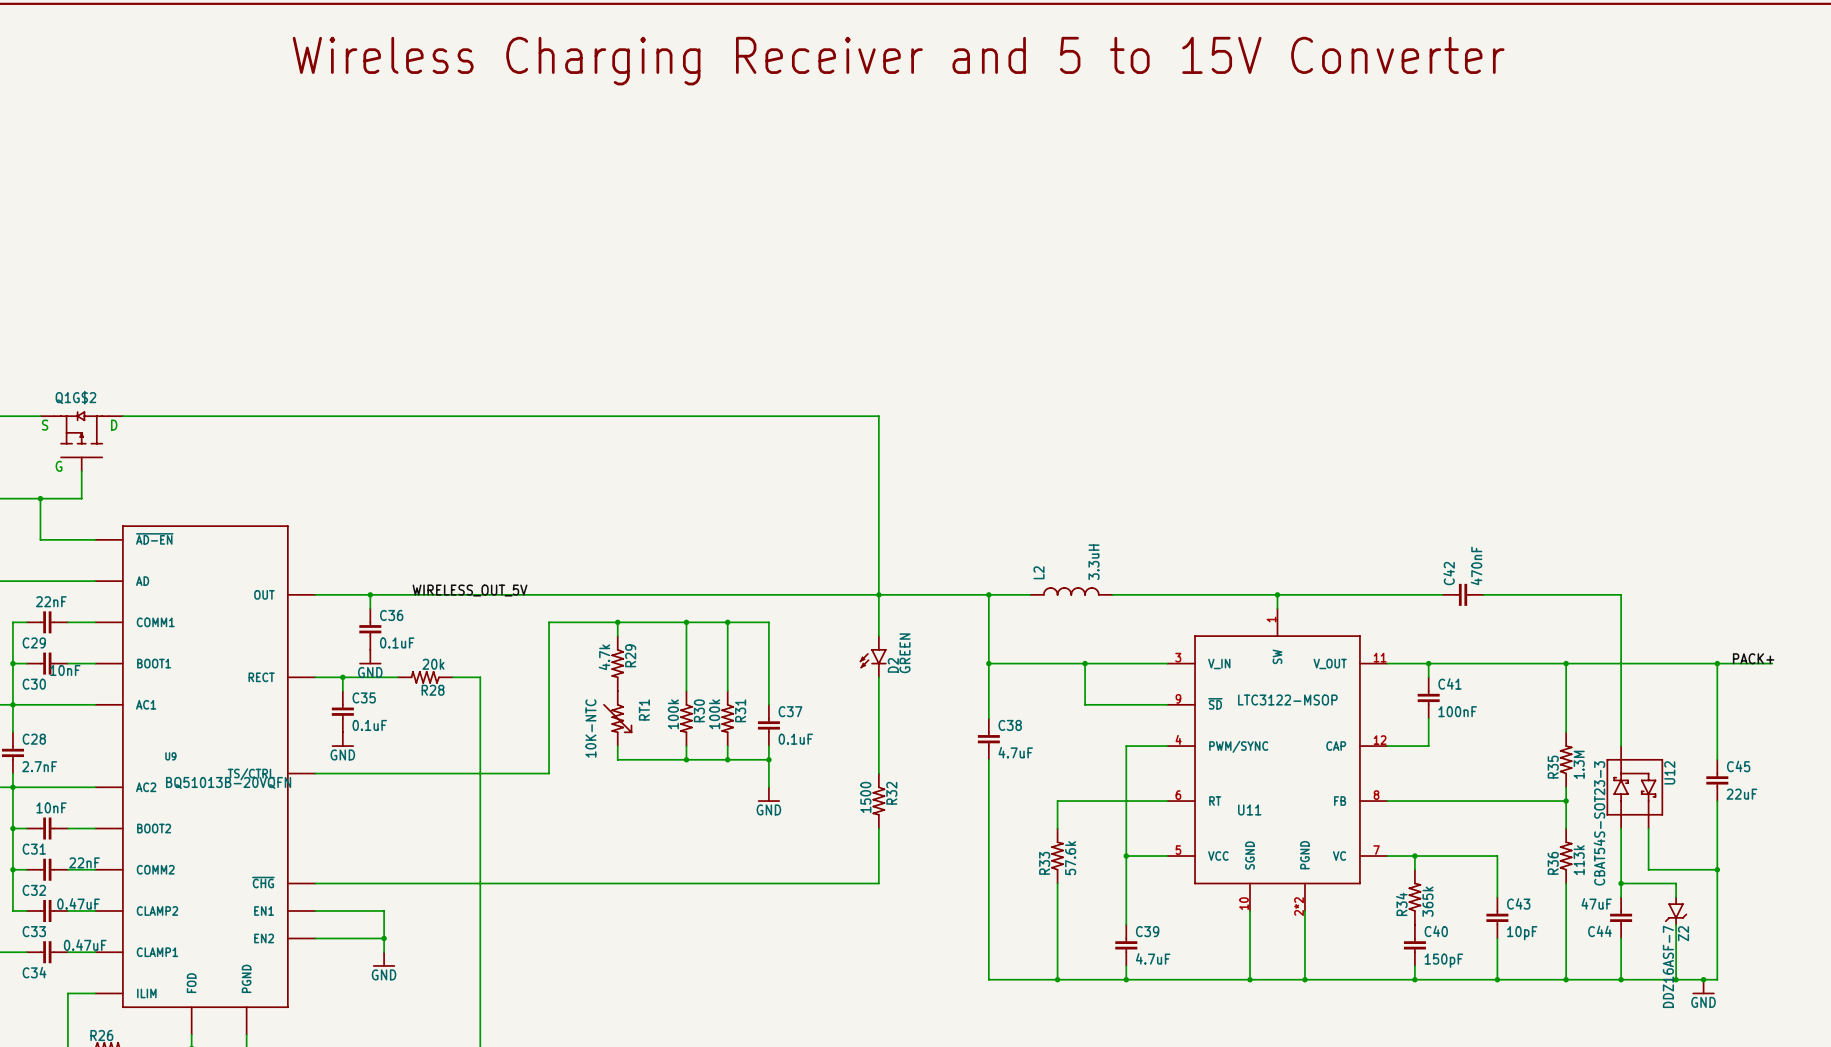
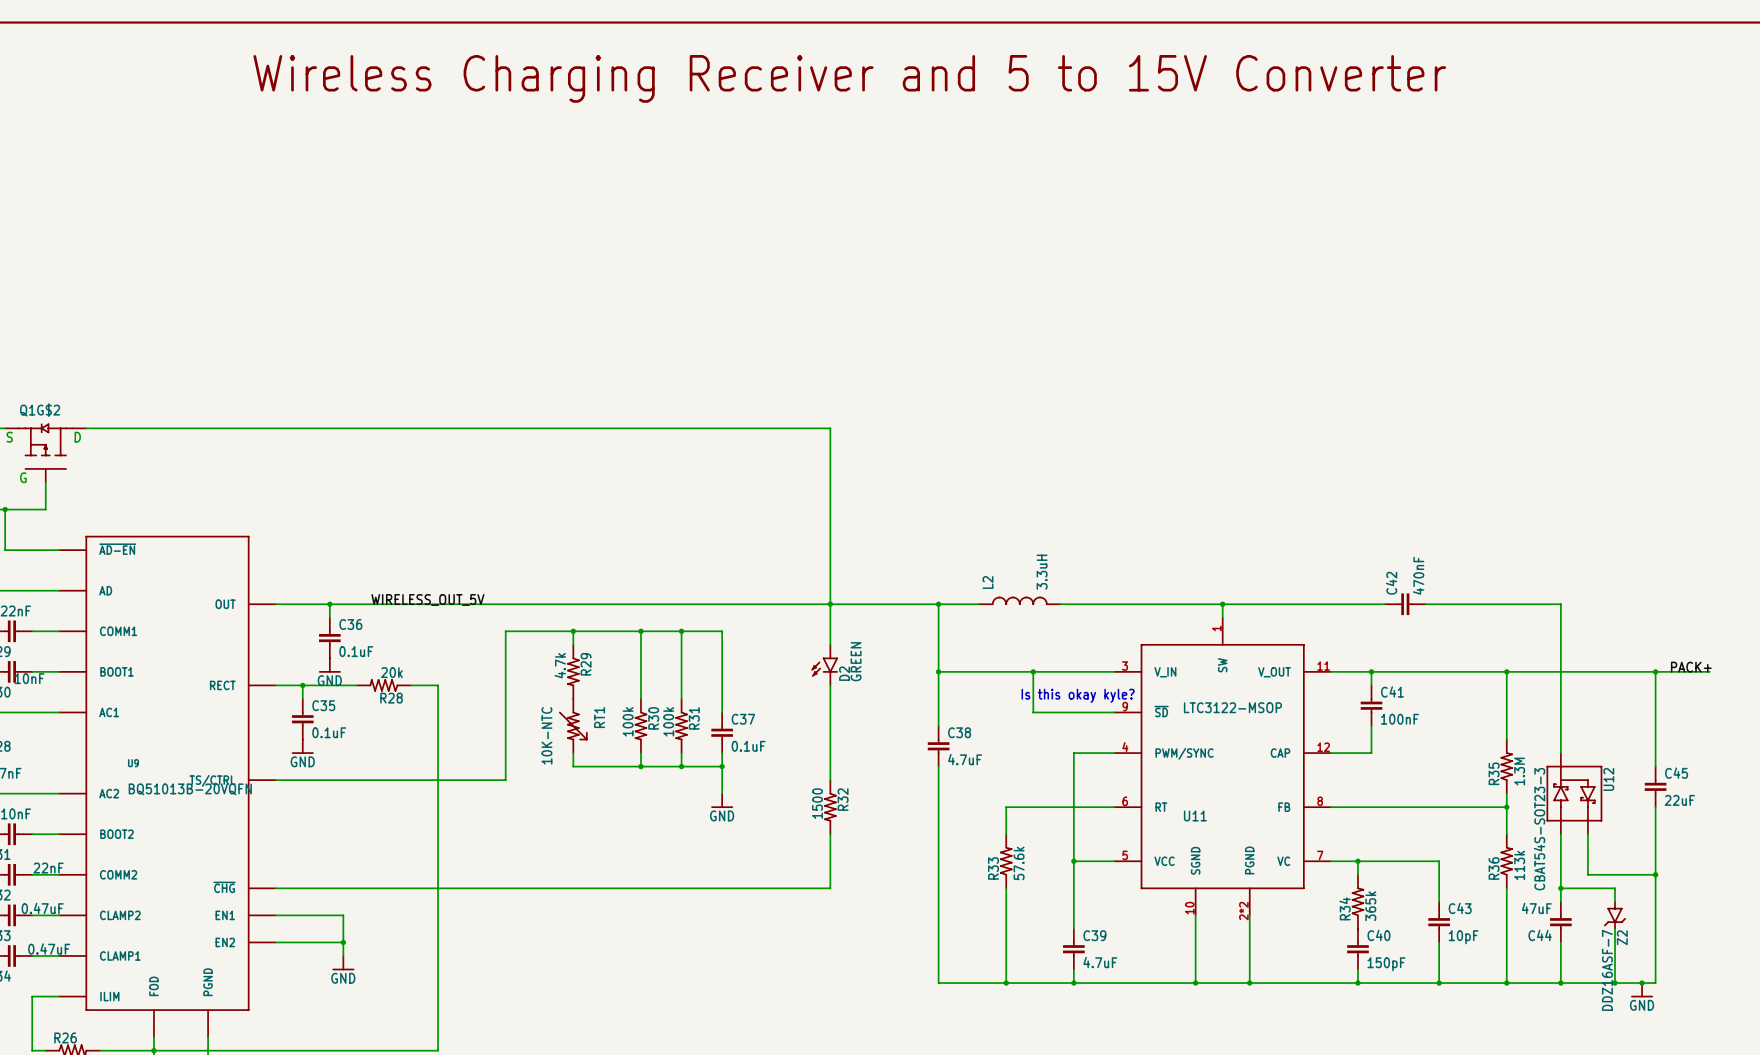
text: none -> Is this okay kyle? (1078, 695)

